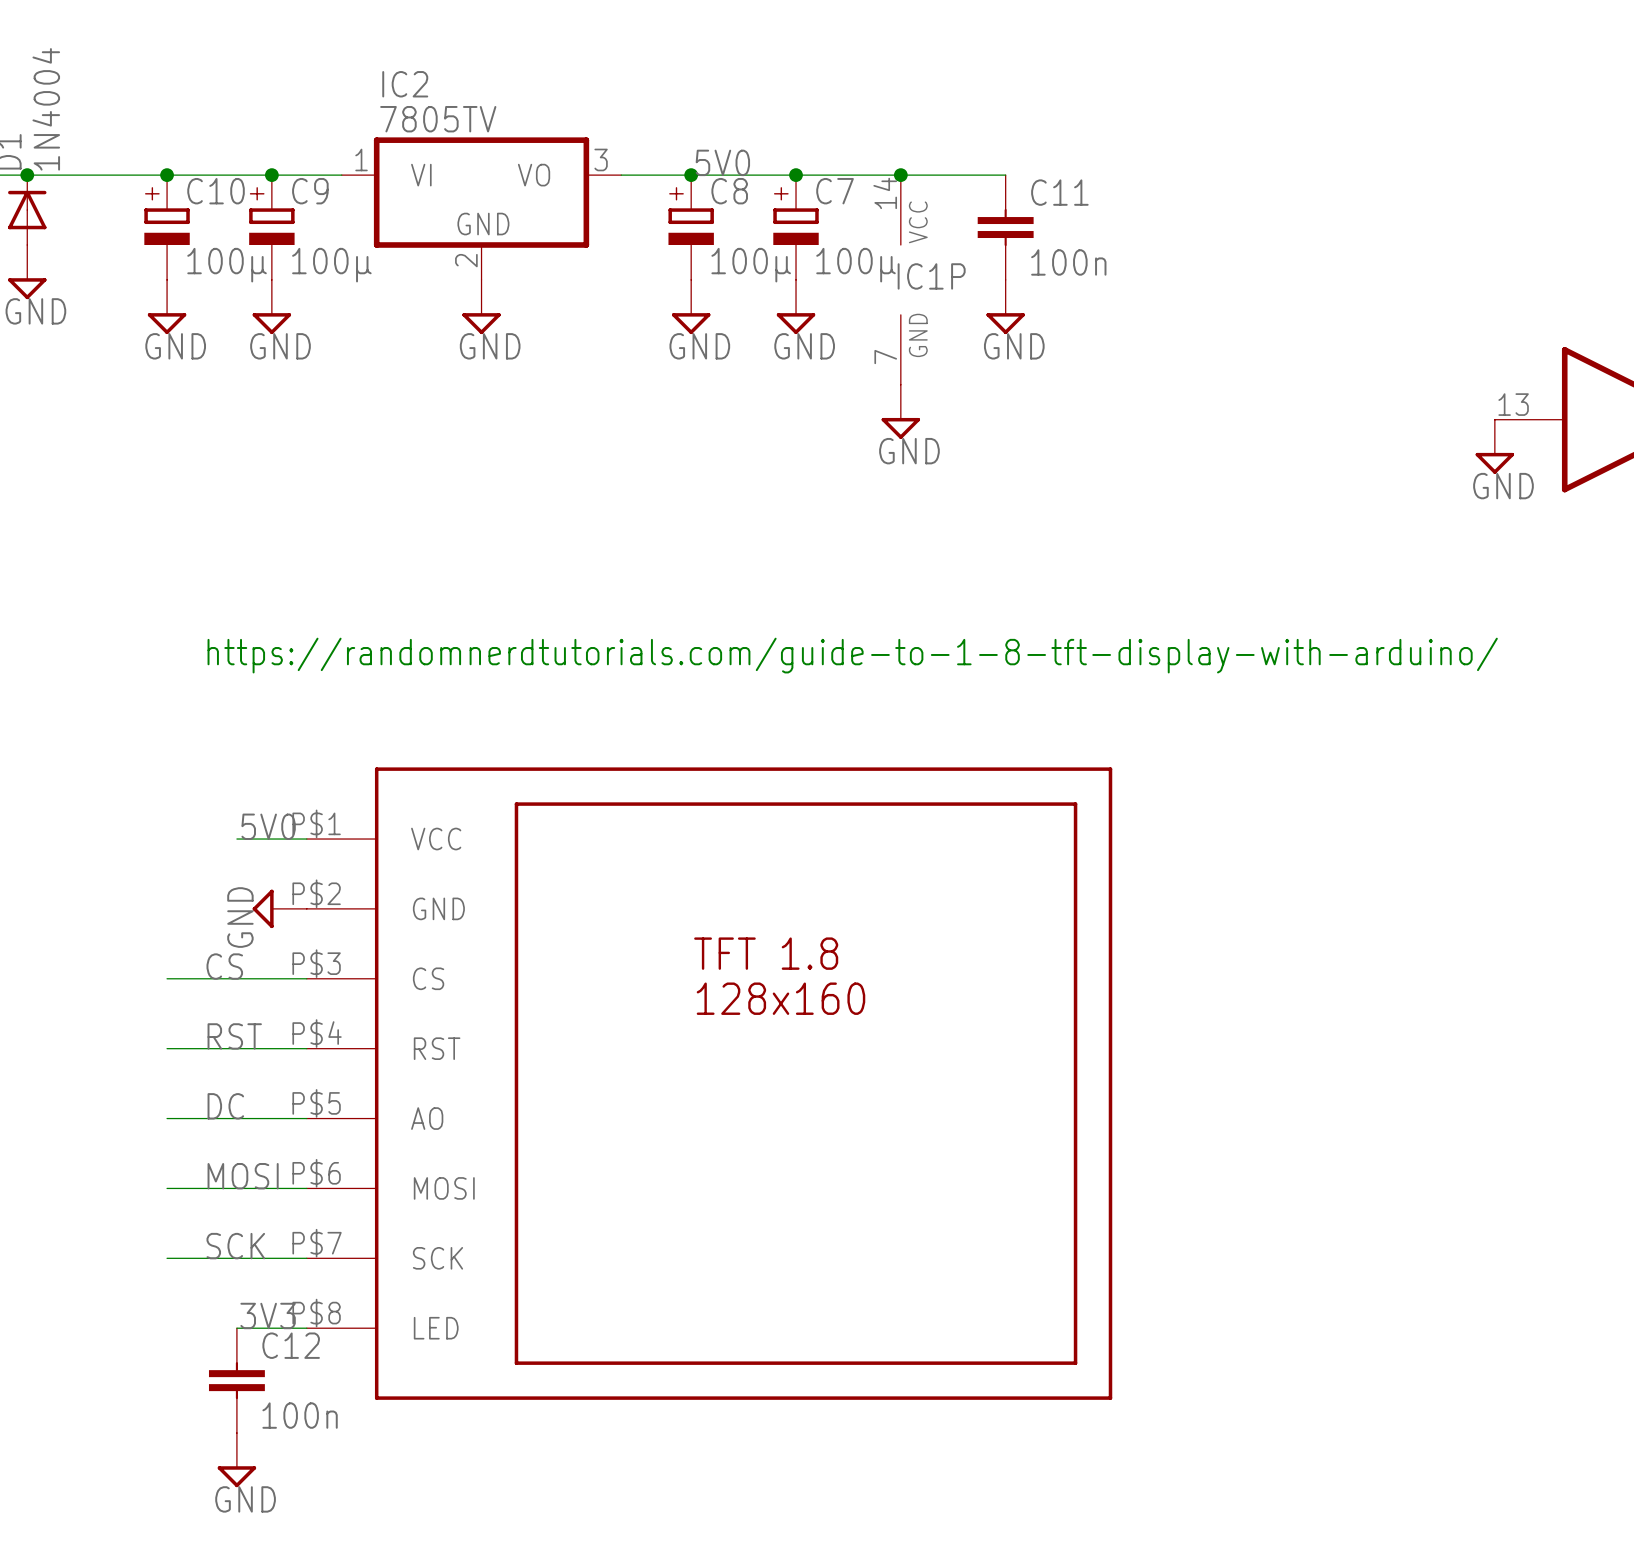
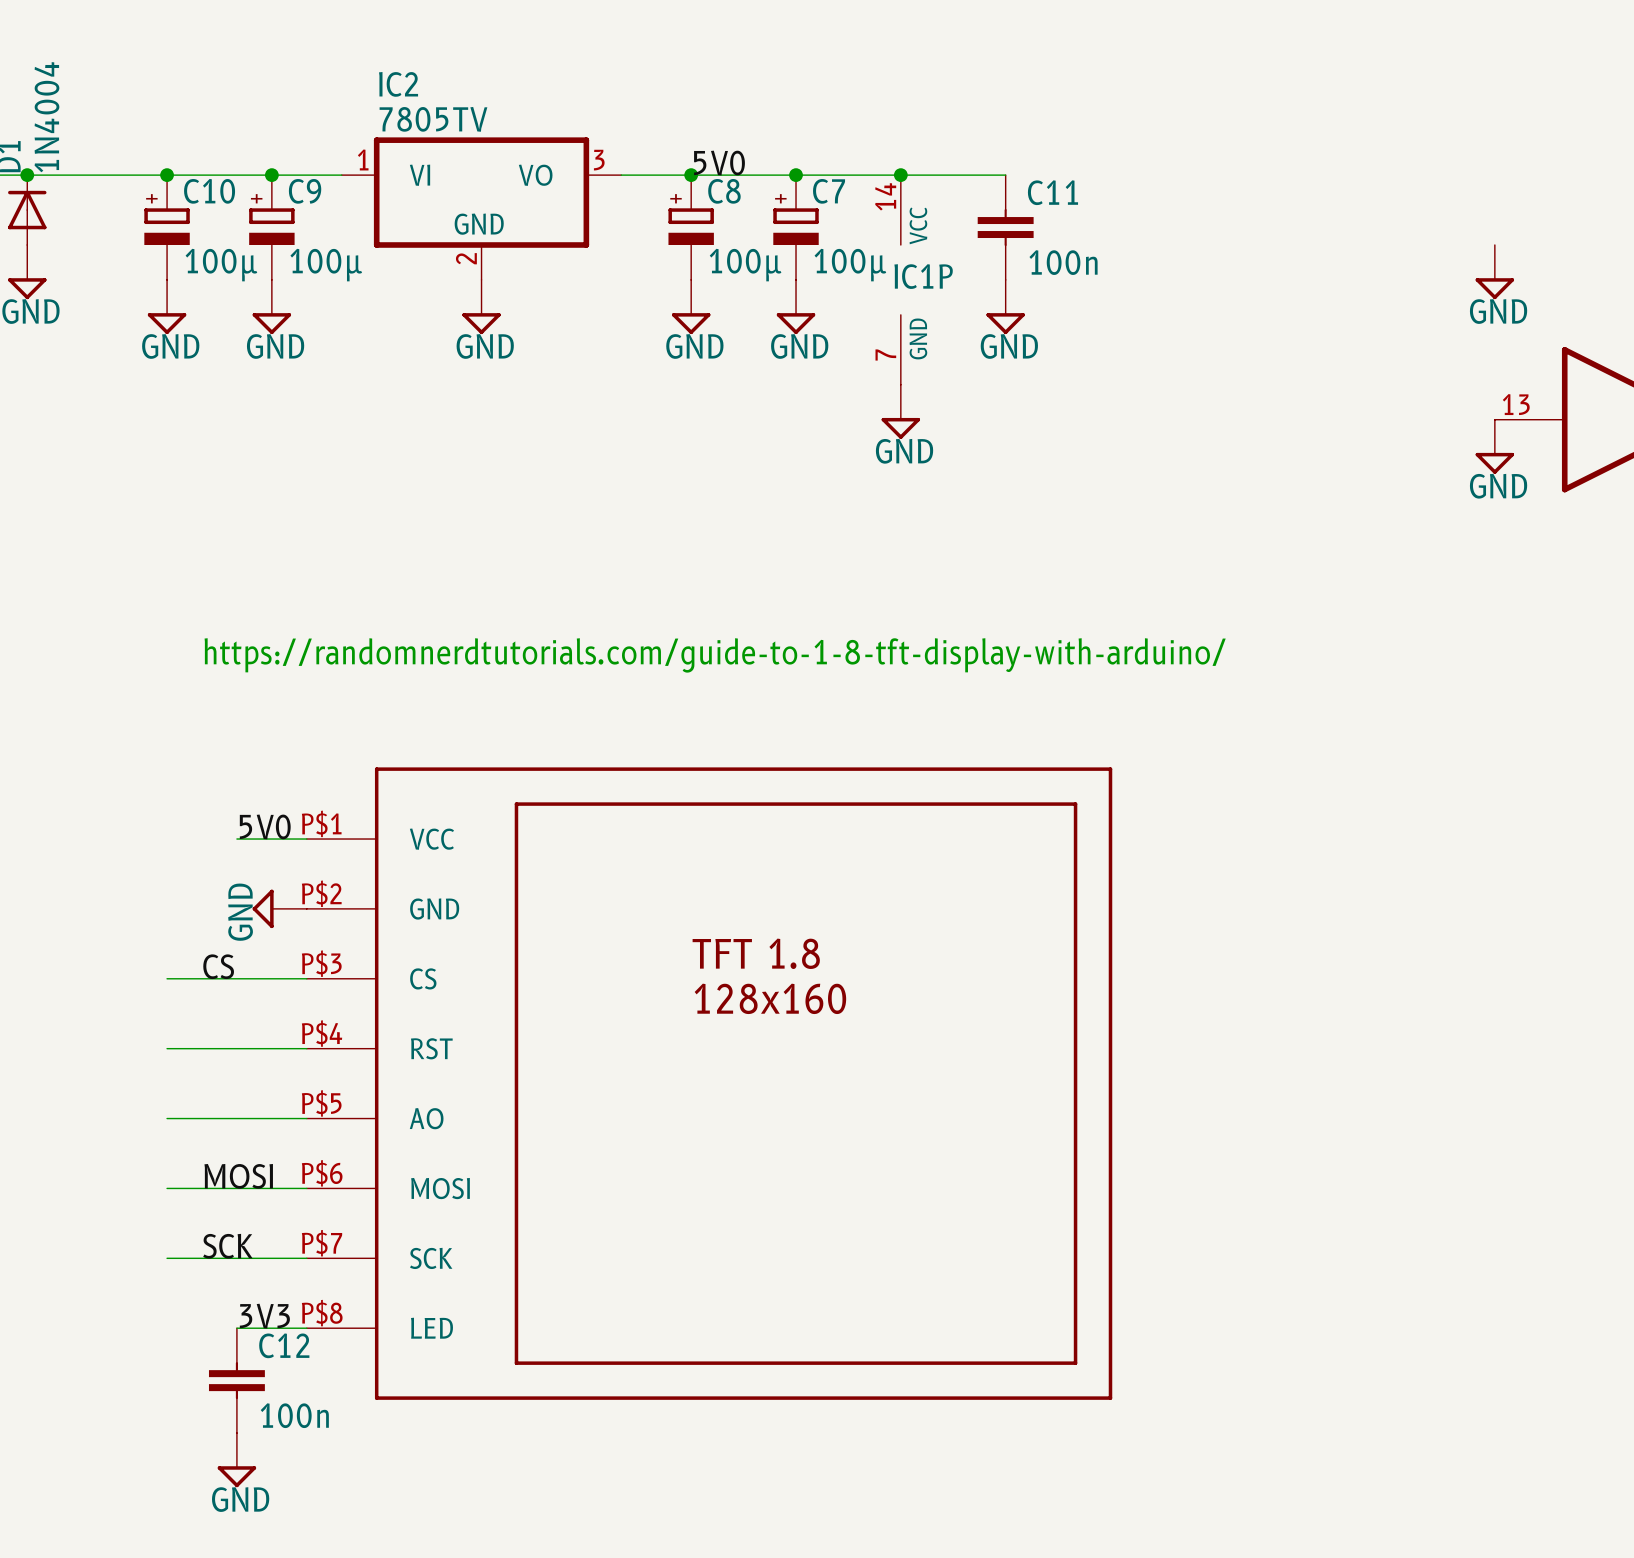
power symbol: none -> GND (1494, 272)
label: RST (234, 1036) -> none
label: DC (225, 1106) -> none

